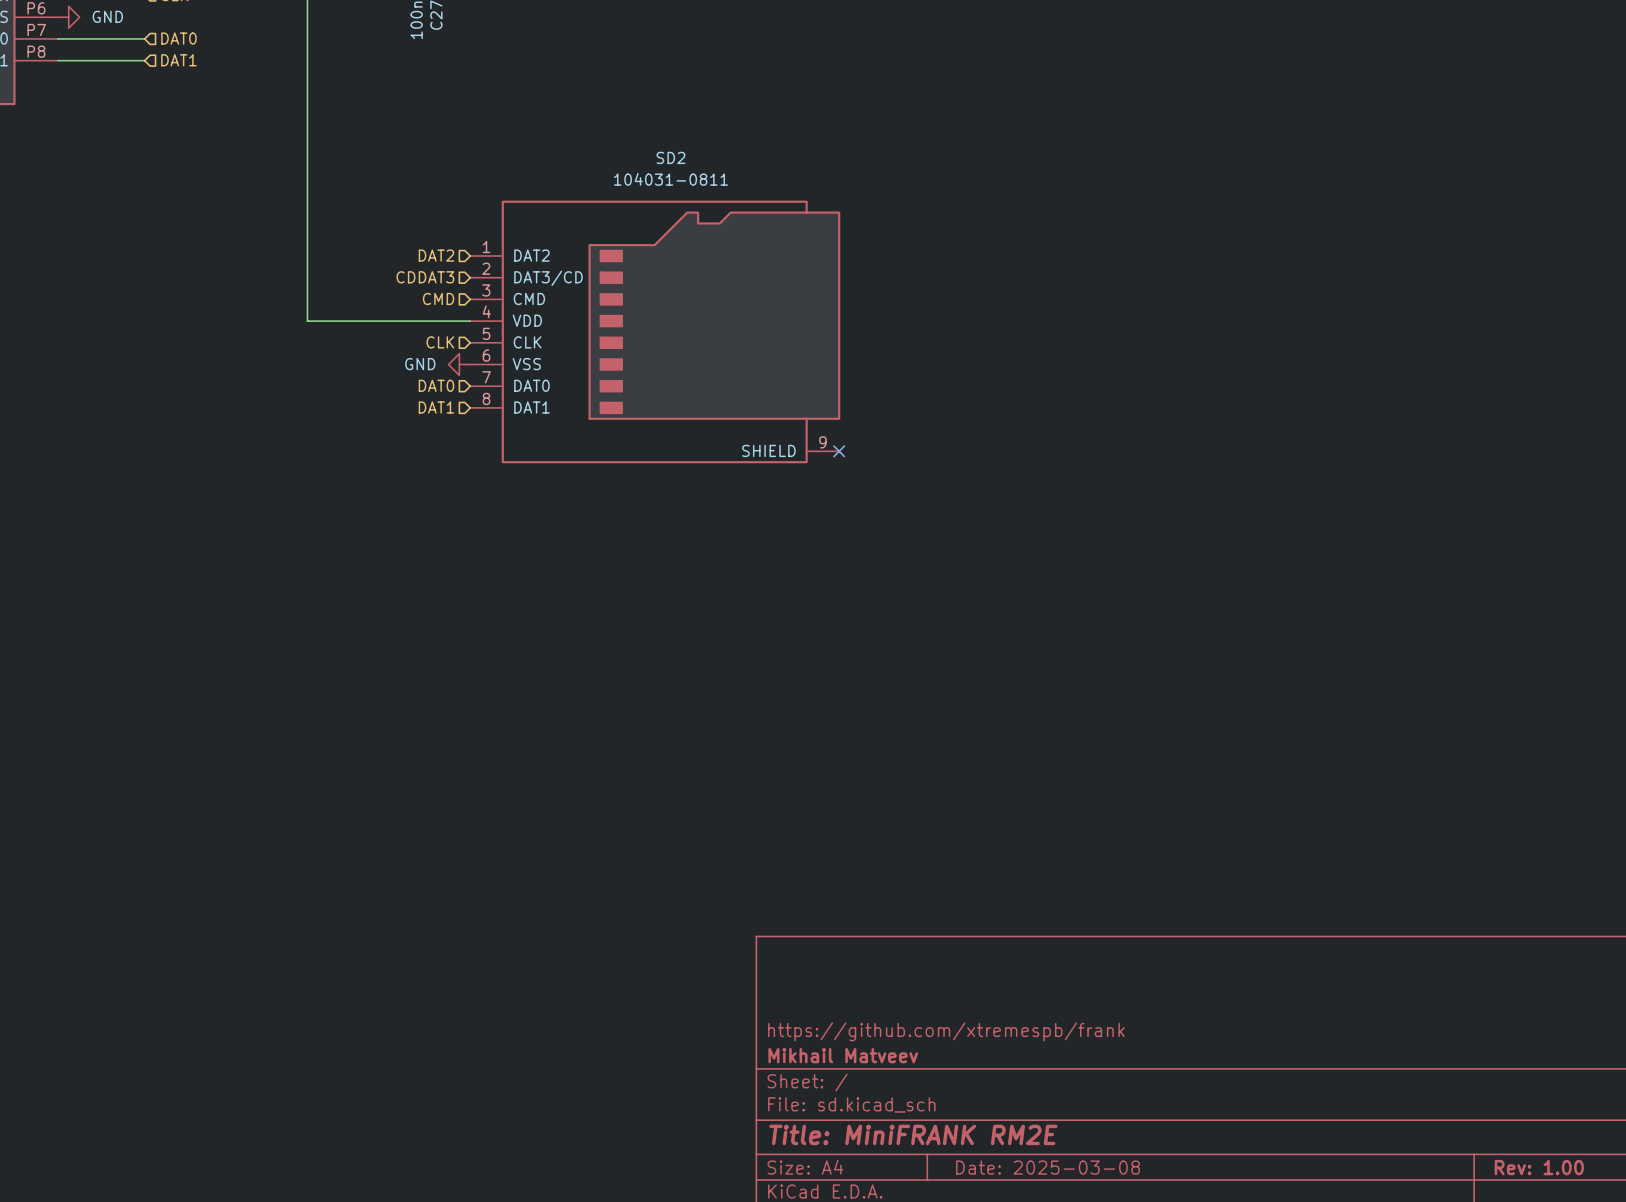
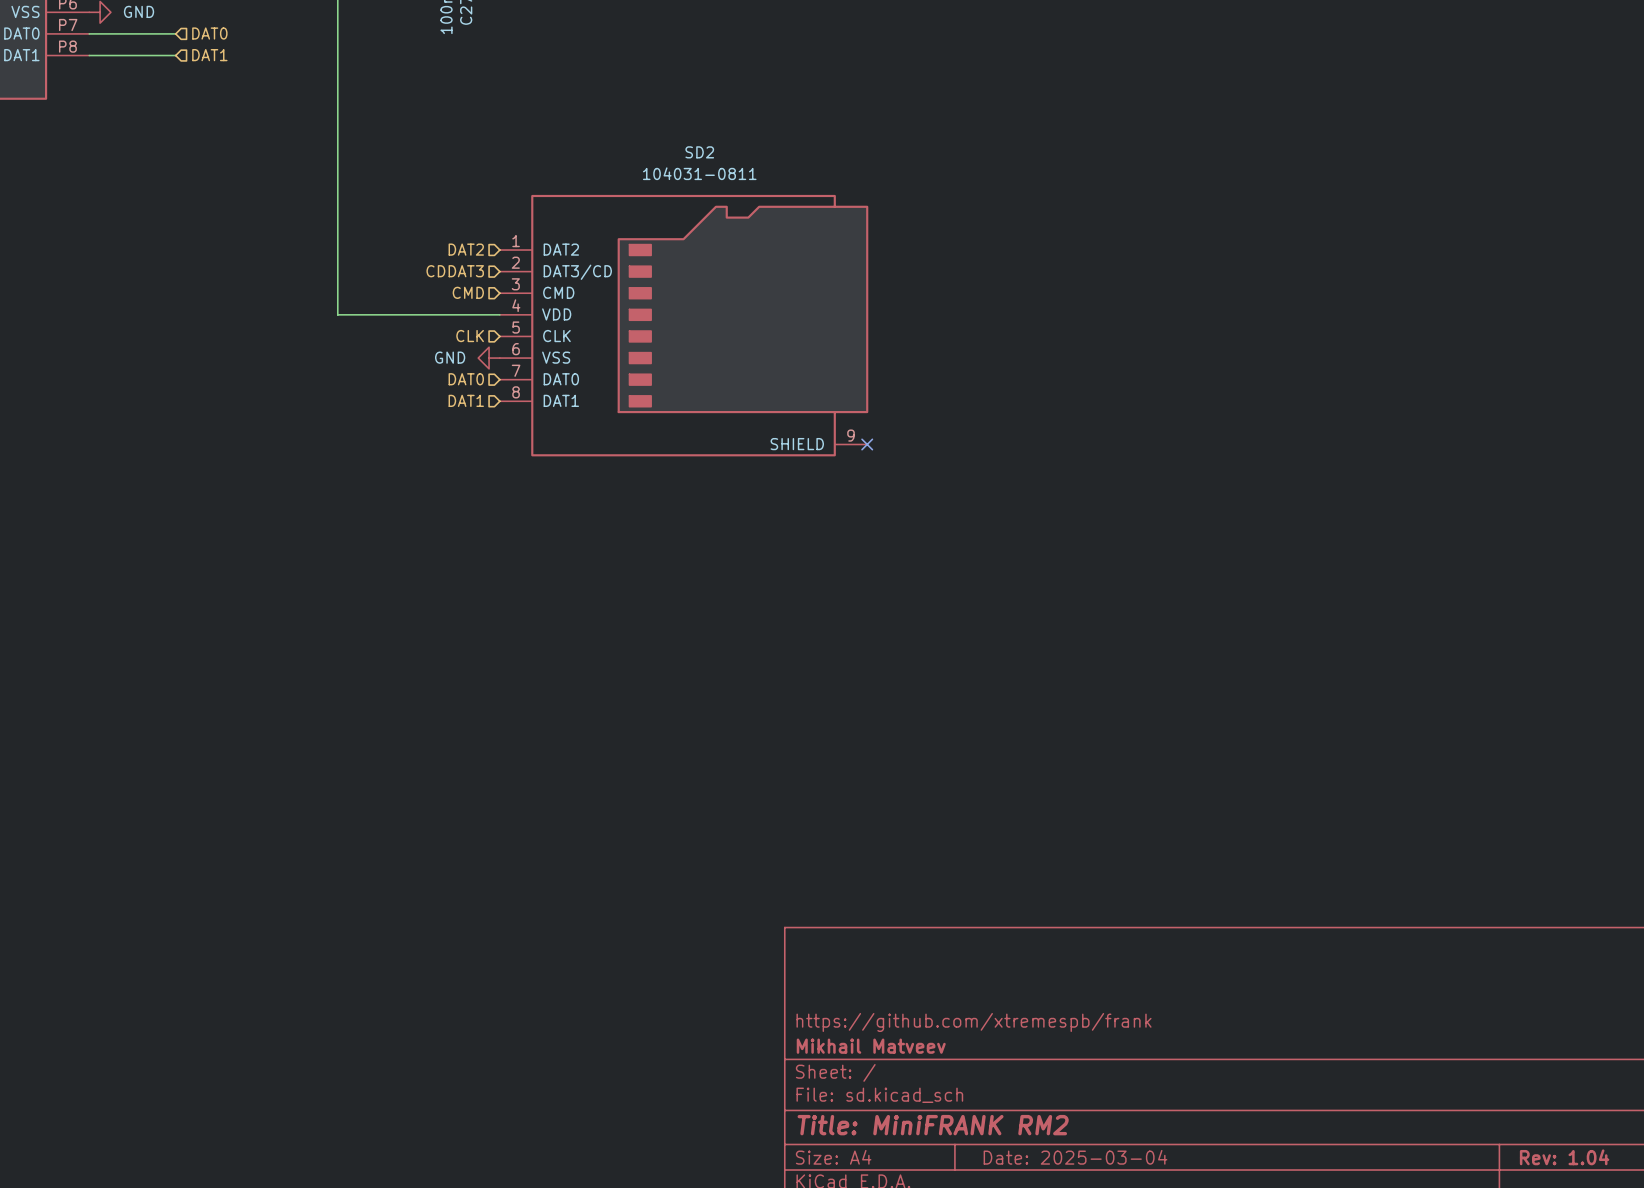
title block: Title: MiniFRANK RM2E (913, 1134) -> Title: MiniFRANK RM2 (933, 1125)
title block: Date: 2025-03-08 (1048, 1167) -> Date: 2025-03-04 (1075, 1157)
title block: Rev: 1.00 (1539, 1167) -> Rev: 1.04 (1564, 1157)

